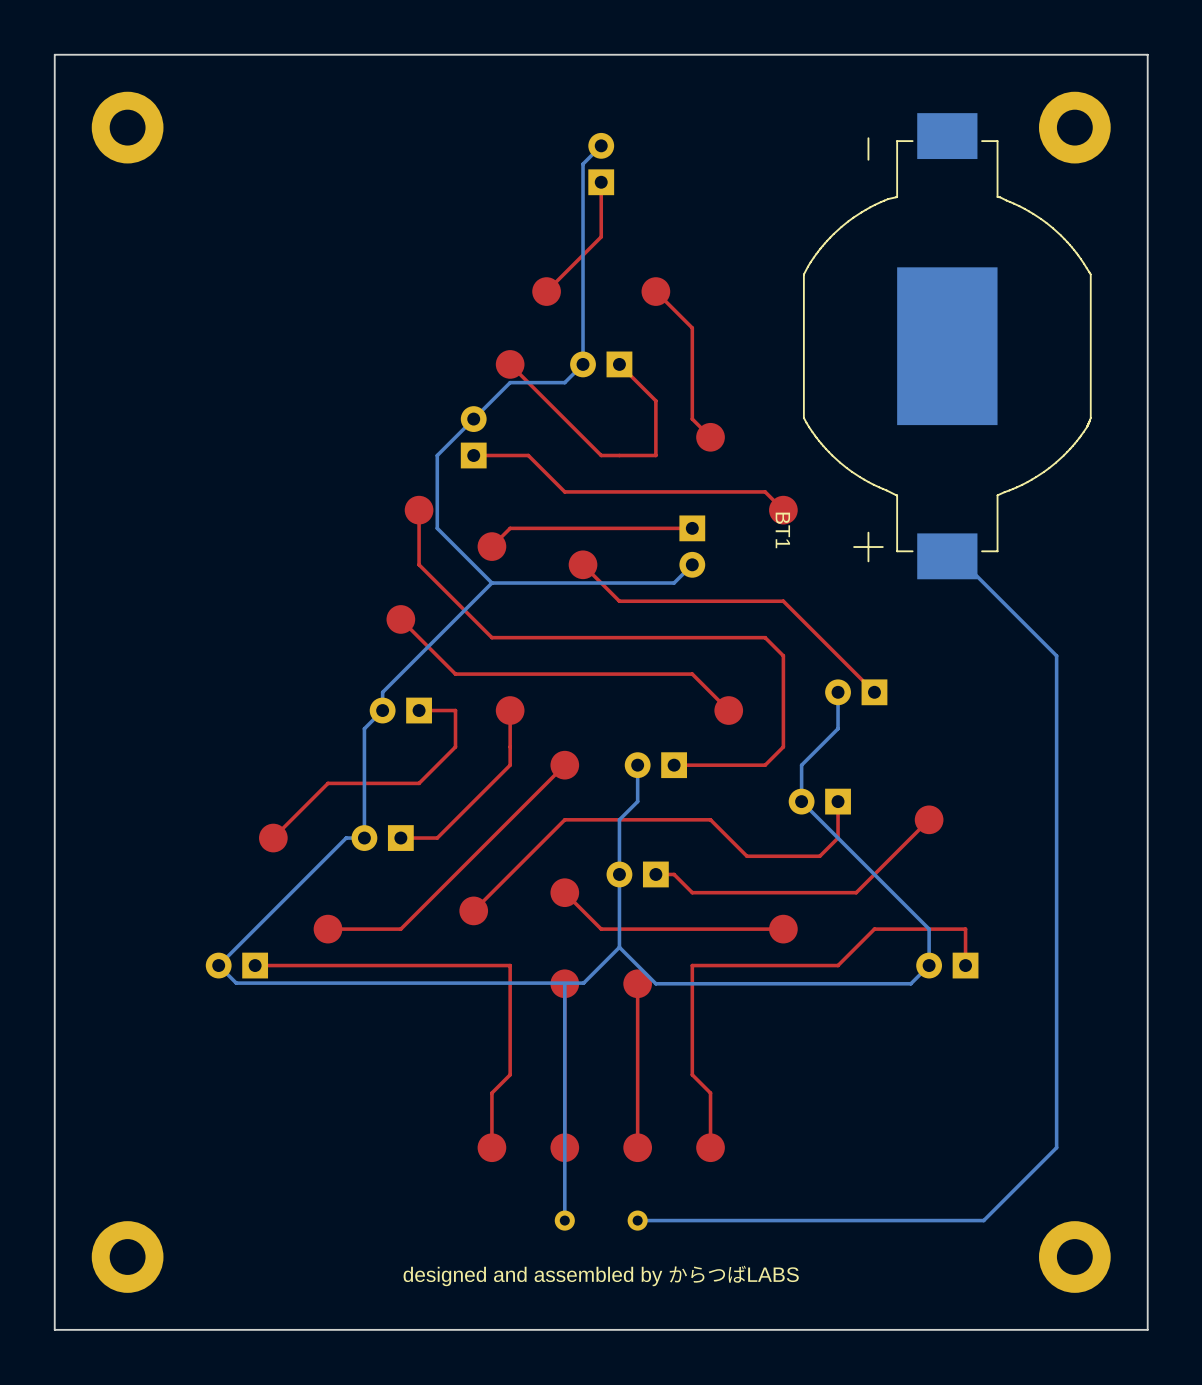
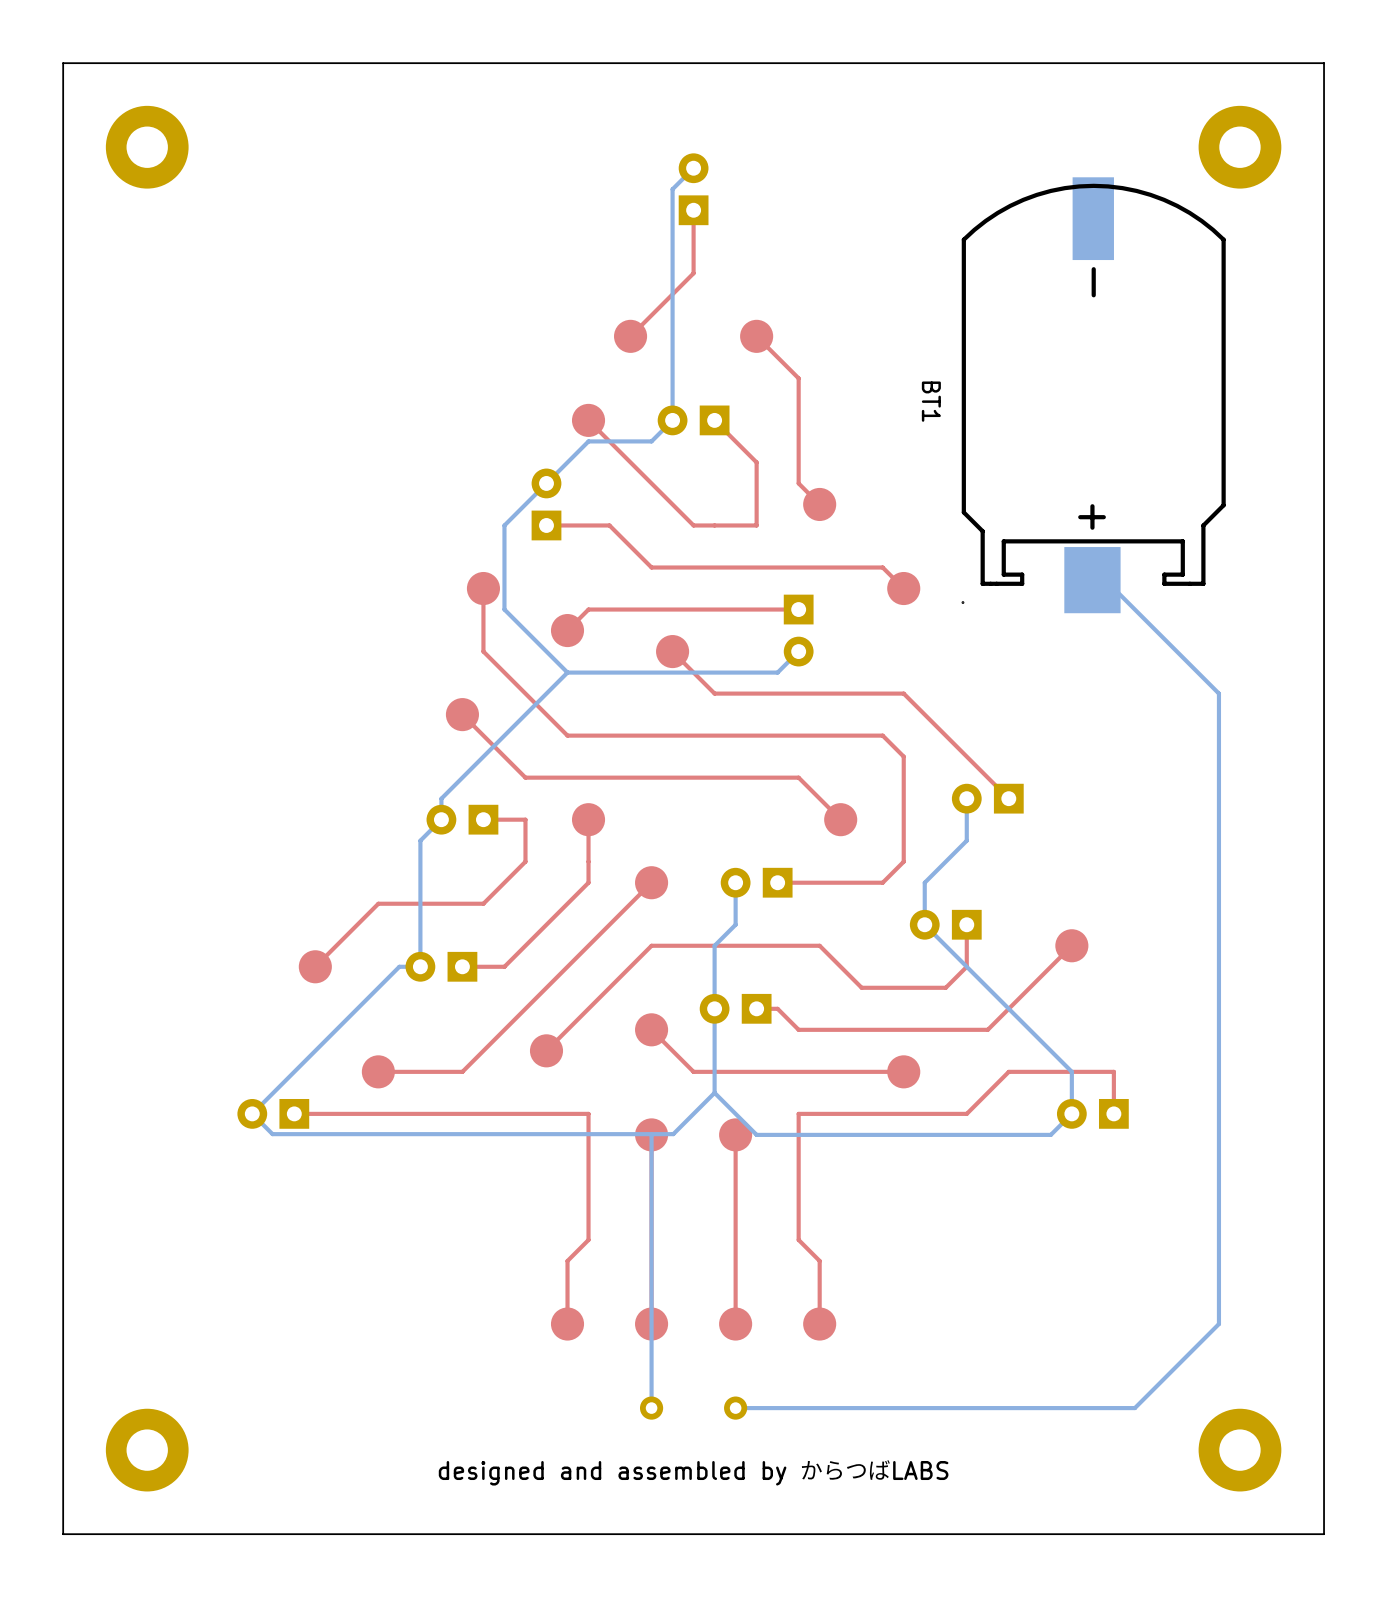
BT1 footprint: [802, 113, 1092, 580] -> [961, 177, 1226, 614]
BT1 name position: BT1 (782, 530) -> BT1 (931, 401)
bottom track: (947, 556) (957, 556) (1056, 655) -> (1092, 580) (1105, 580) (1218, 693) (1218, 756)

